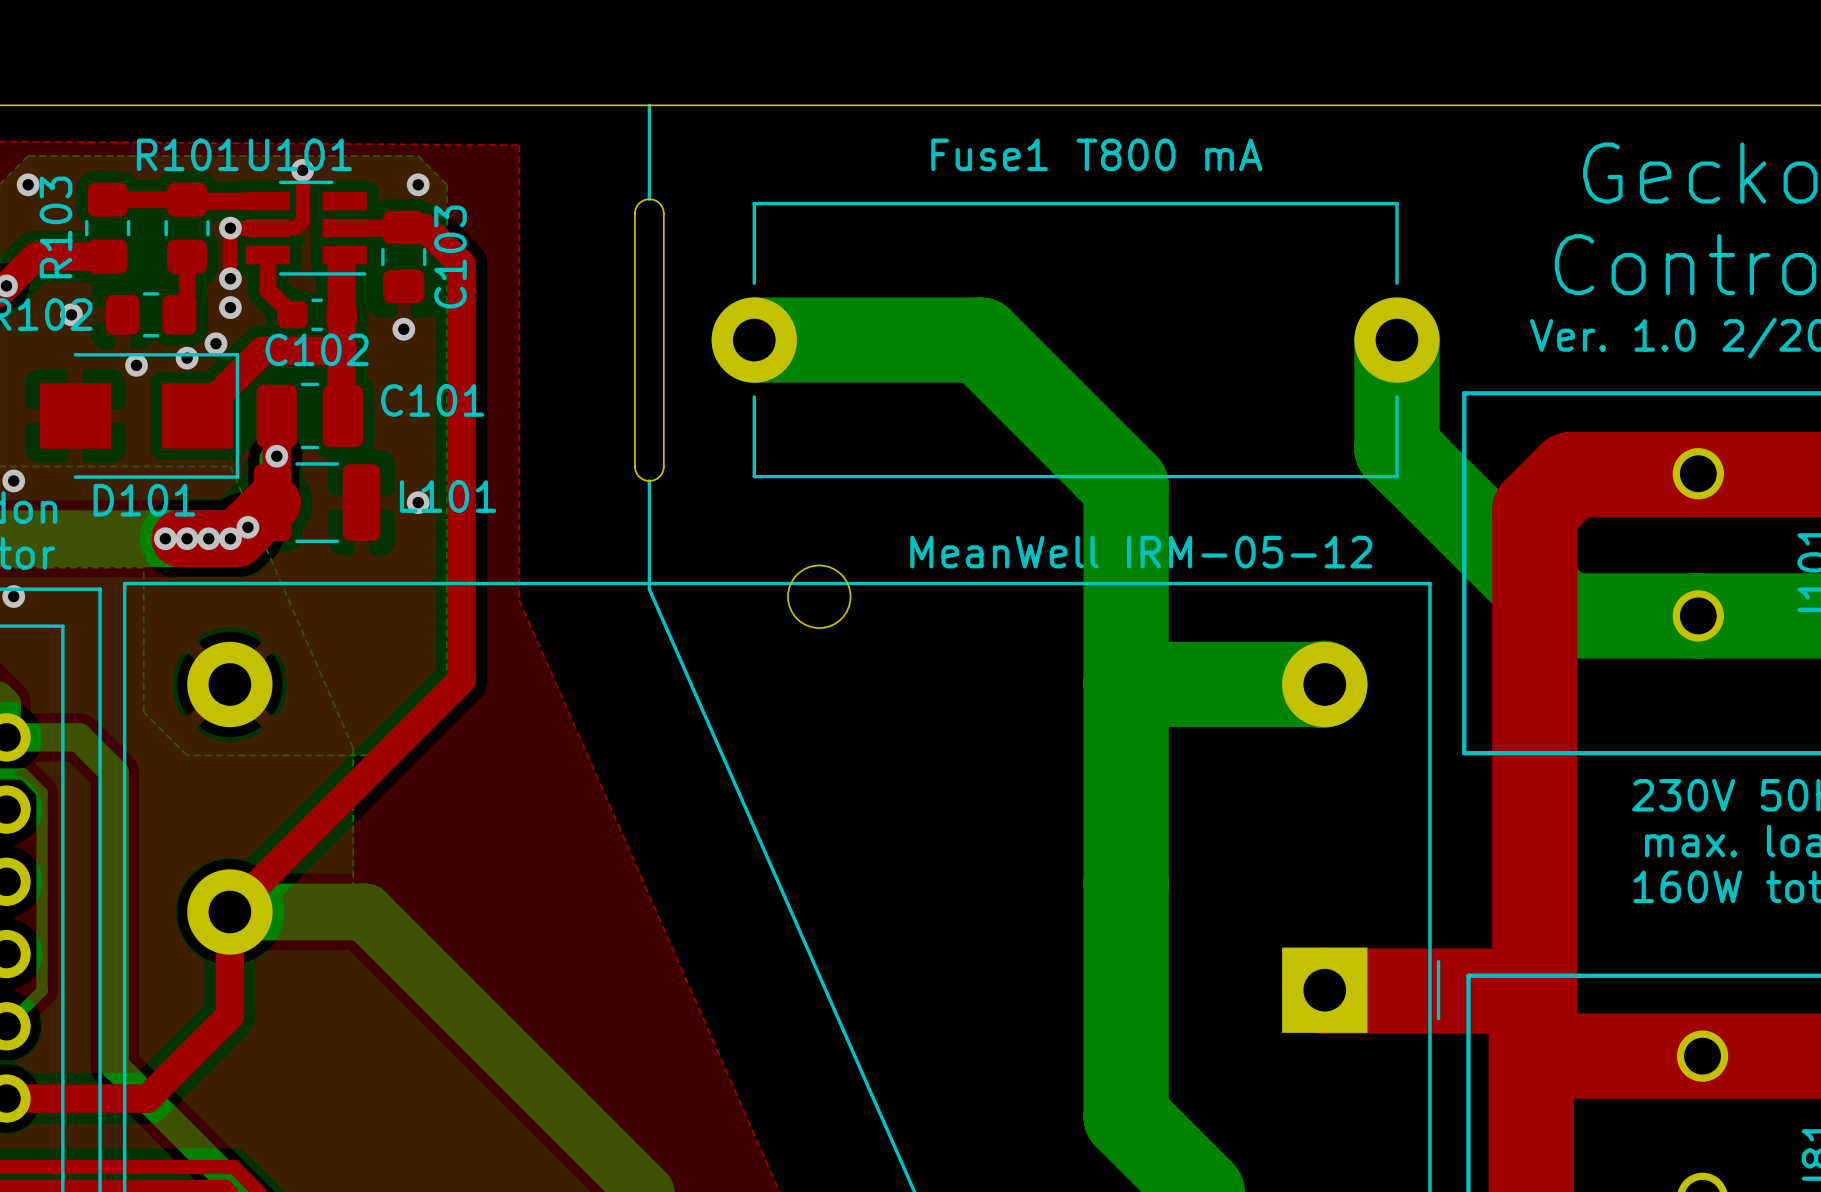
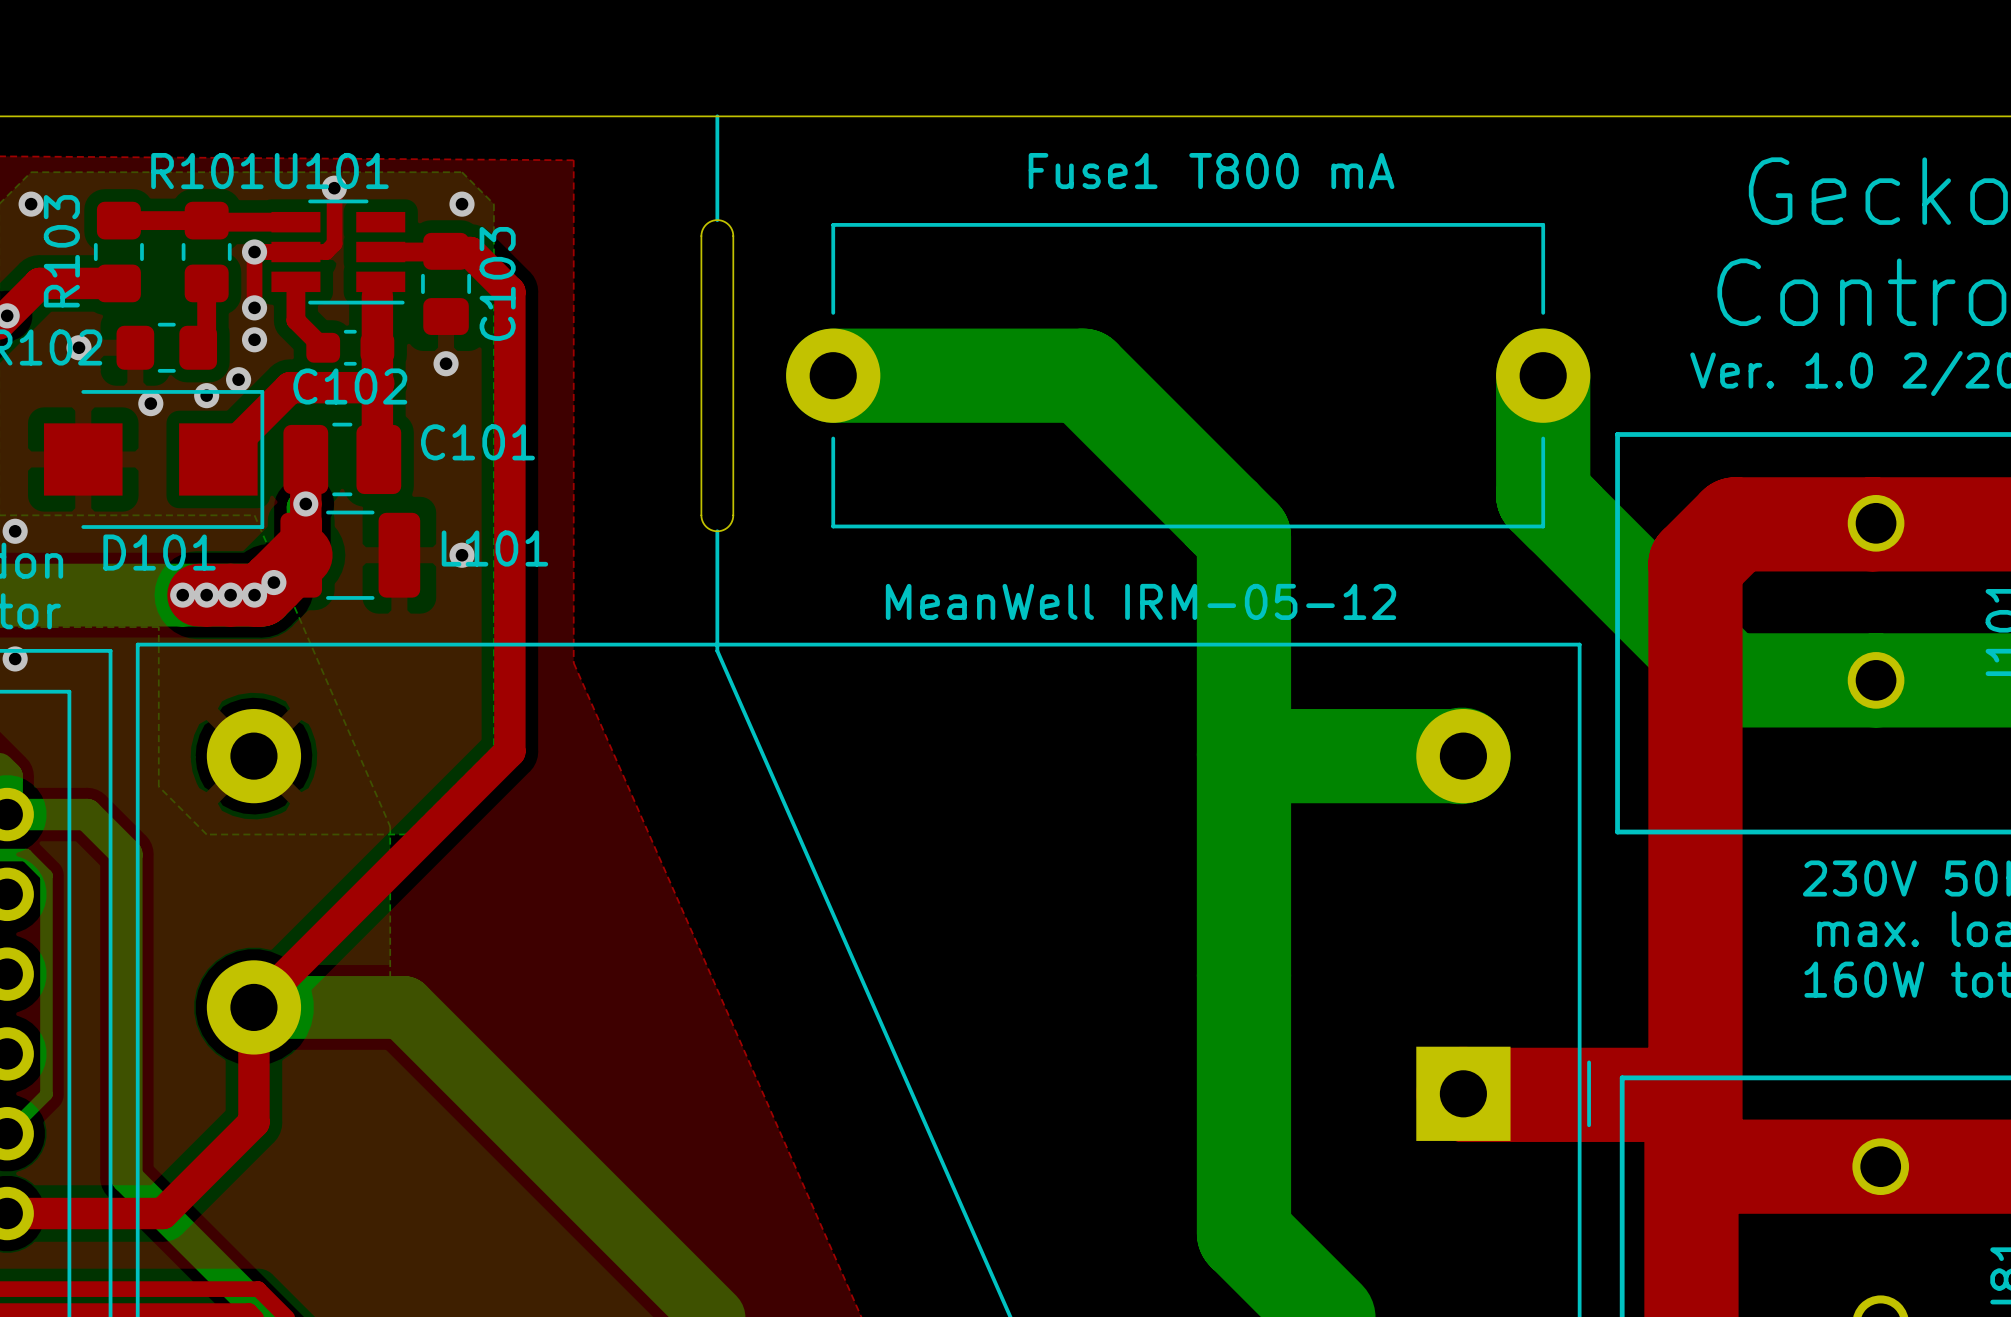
part value position: MeanWell IRM-05-12 (1141, 552) -> MeanWell IRM-05-12 (1140, 601)
round board edge: [787, 564, 852, 629] -> none

